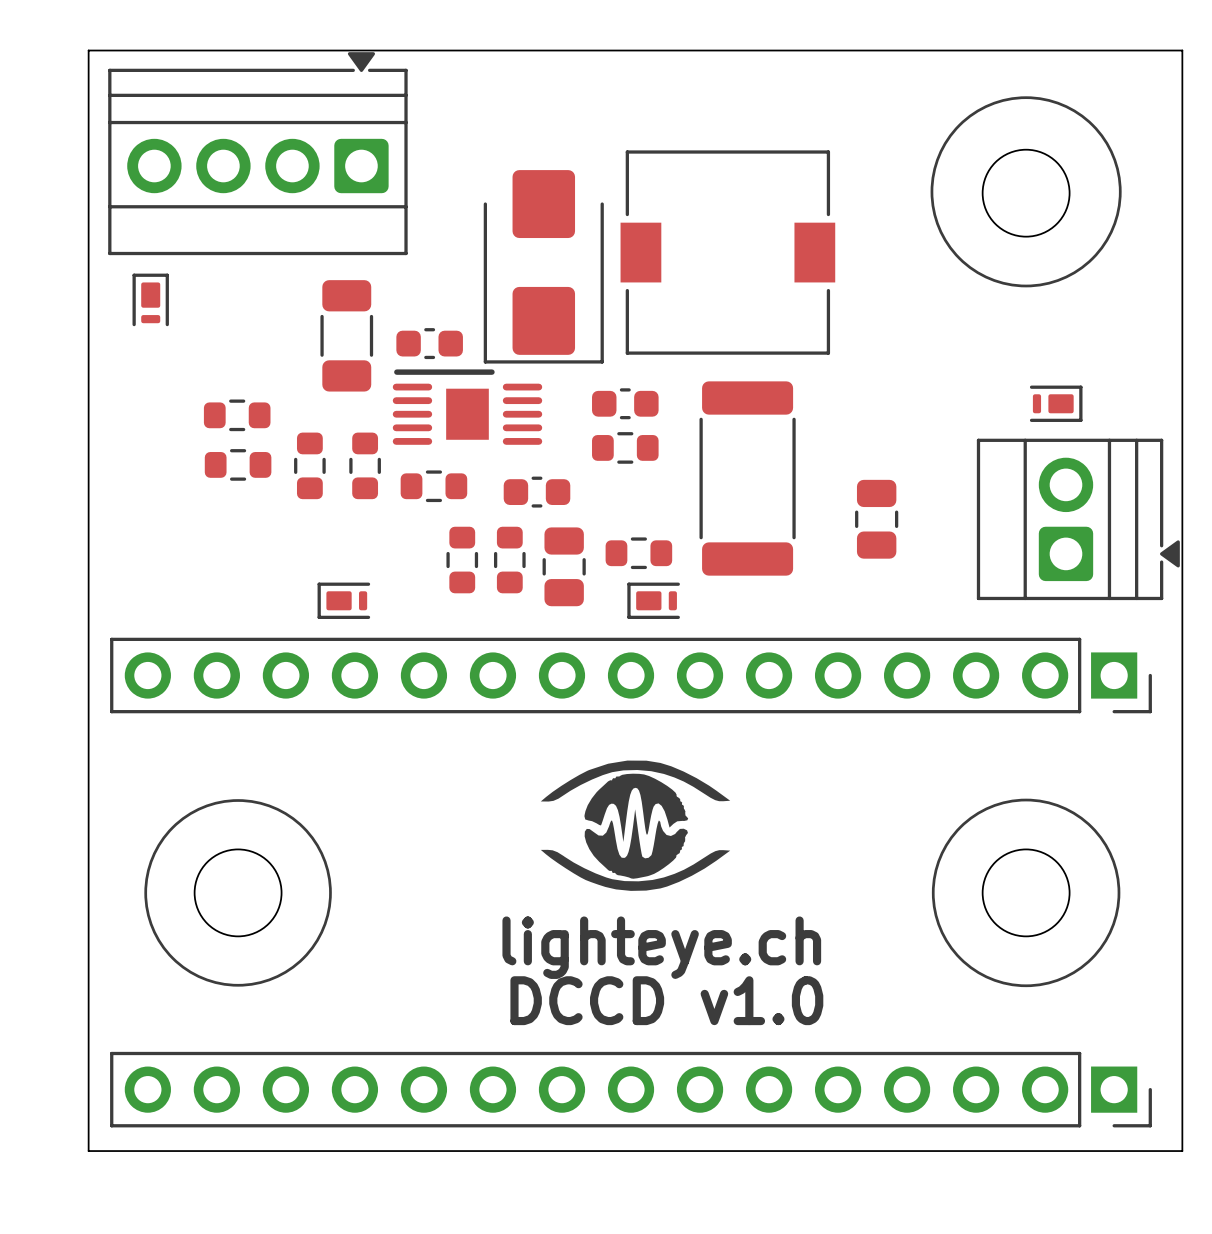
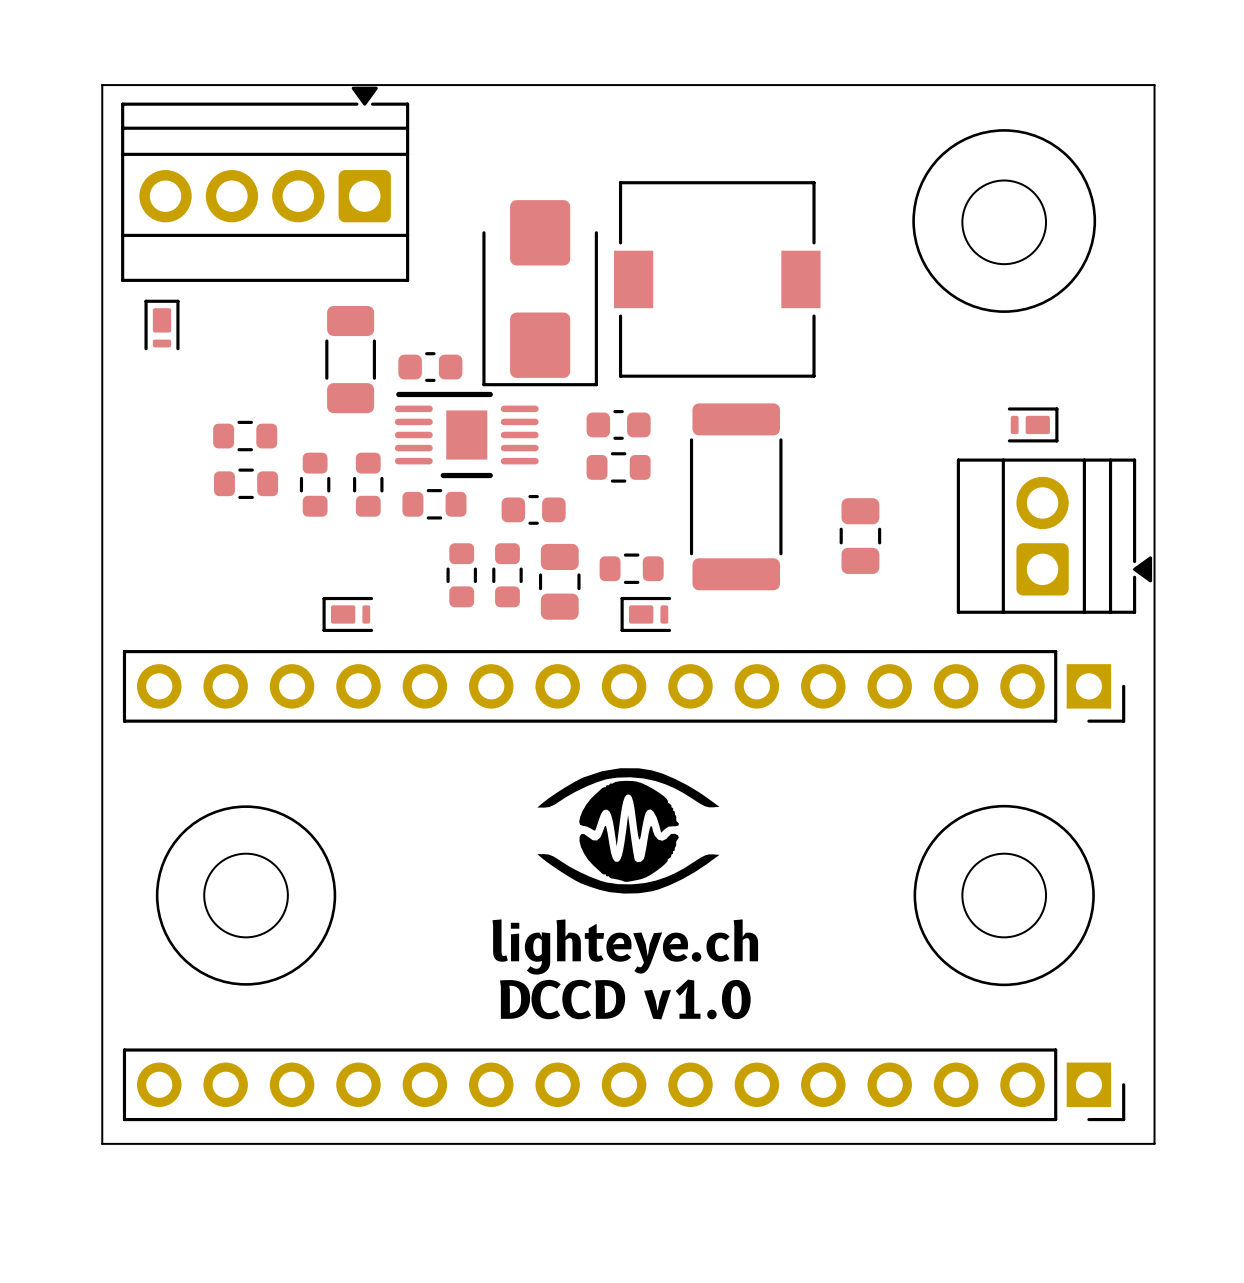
part footprint: [392, 369, 543, 445] -> [394, 391, 539, 479]

